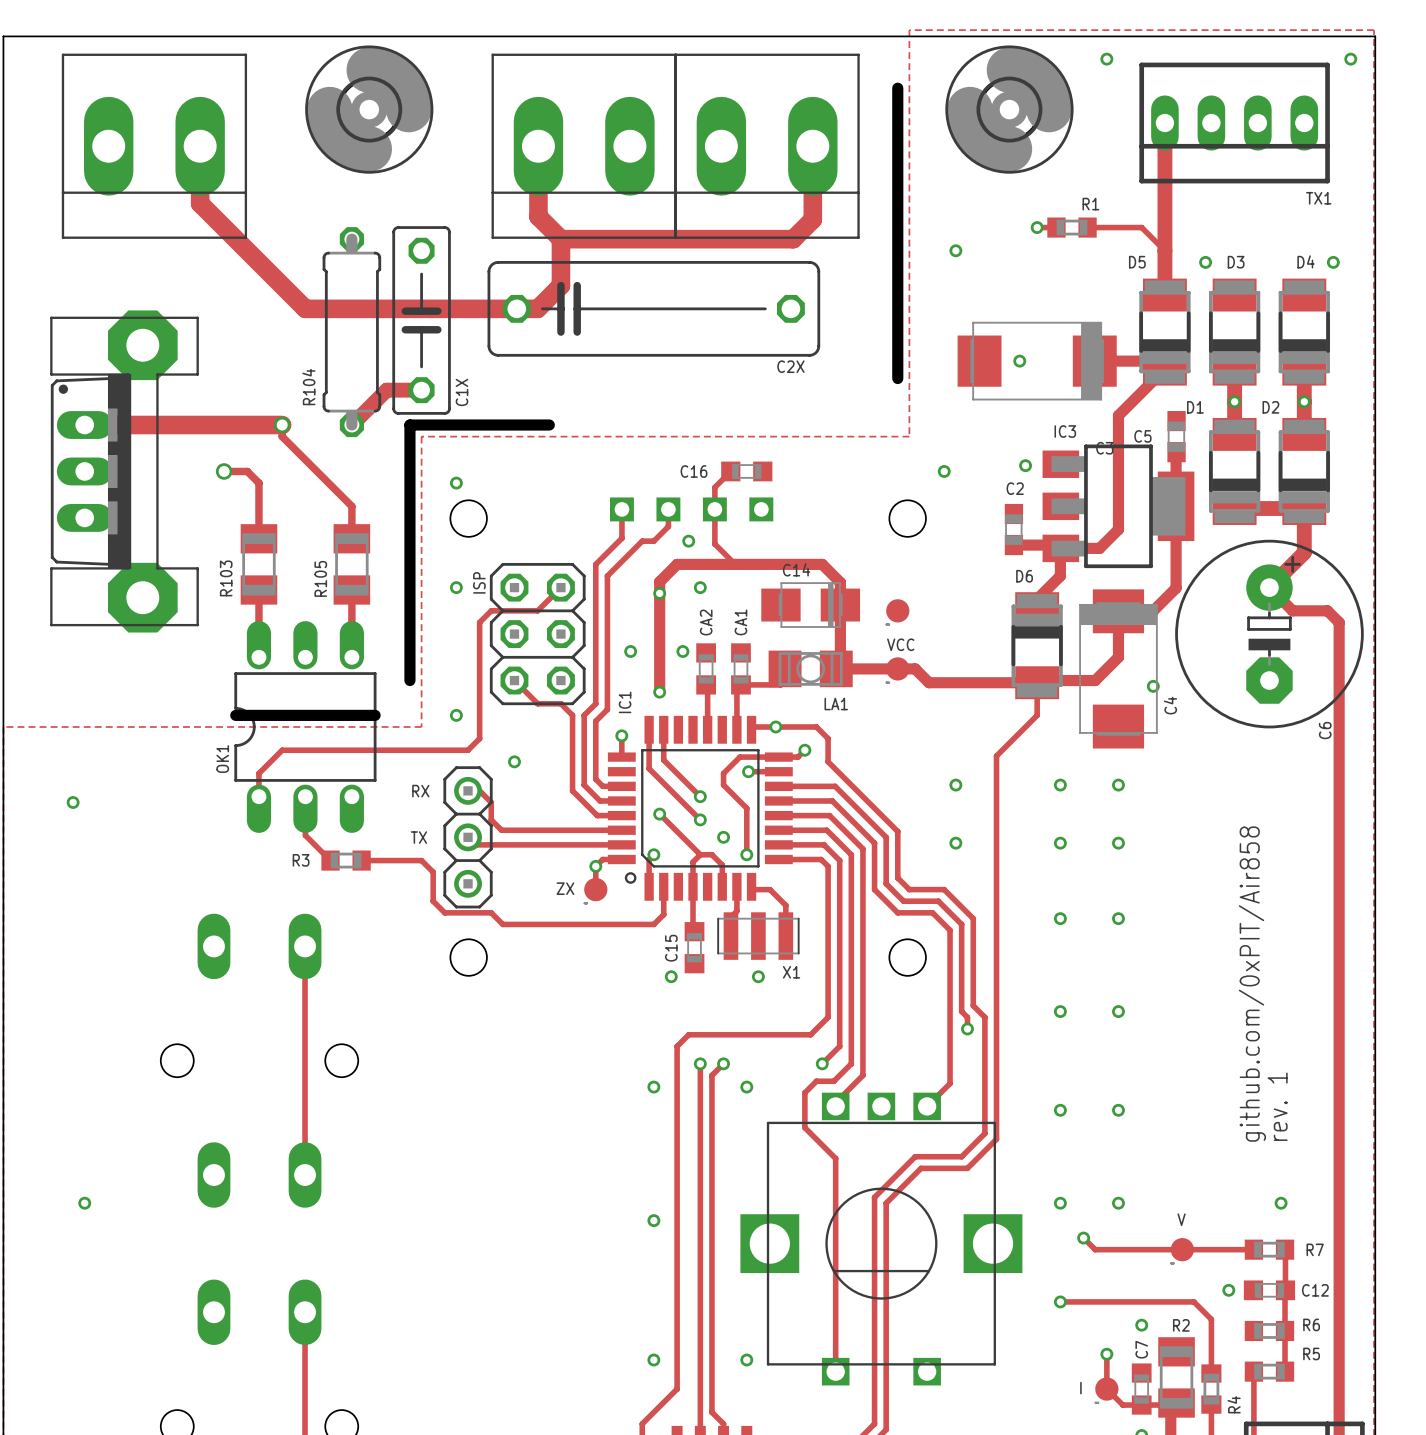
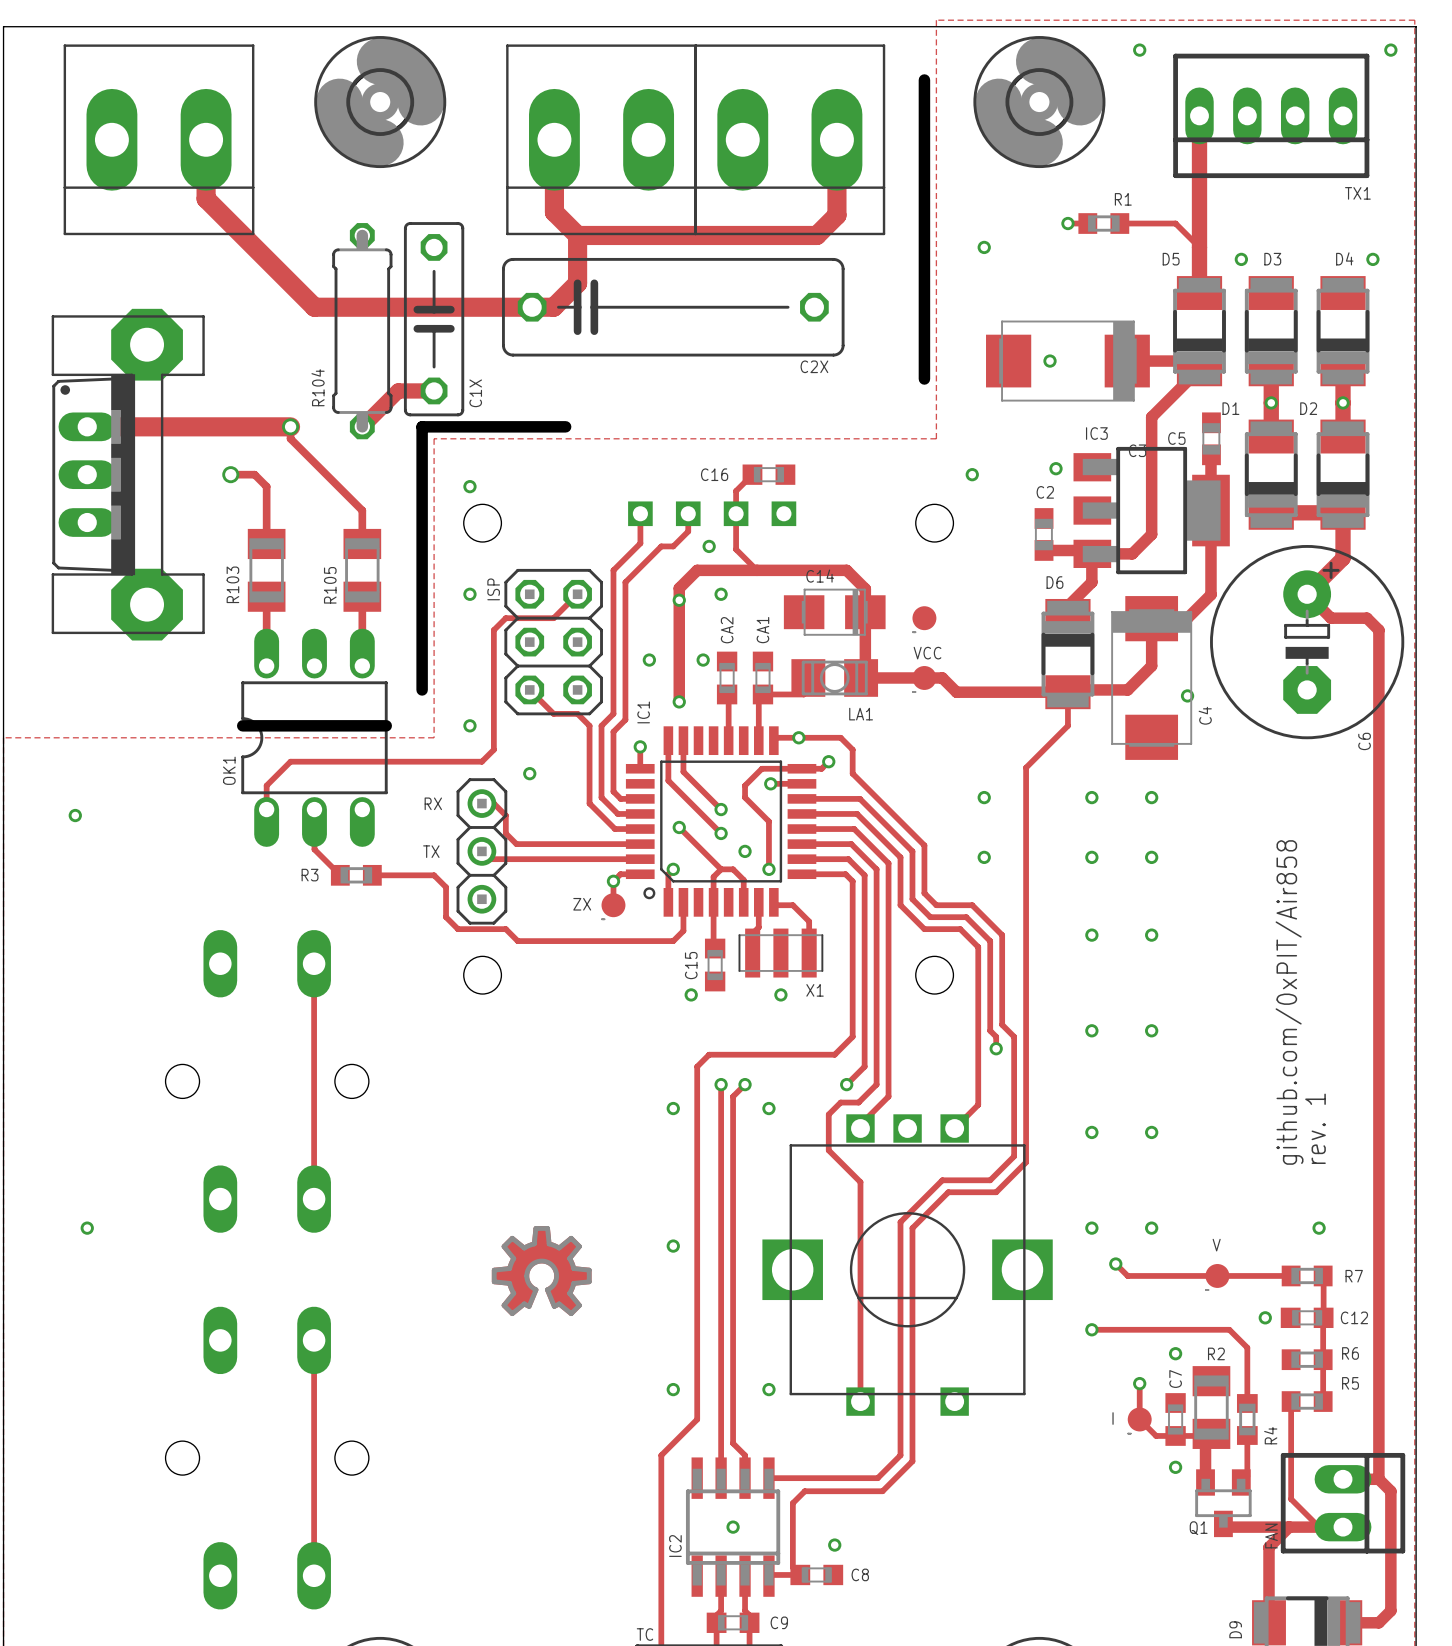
drawing: none -> [491, 1226, 592, 1317]

